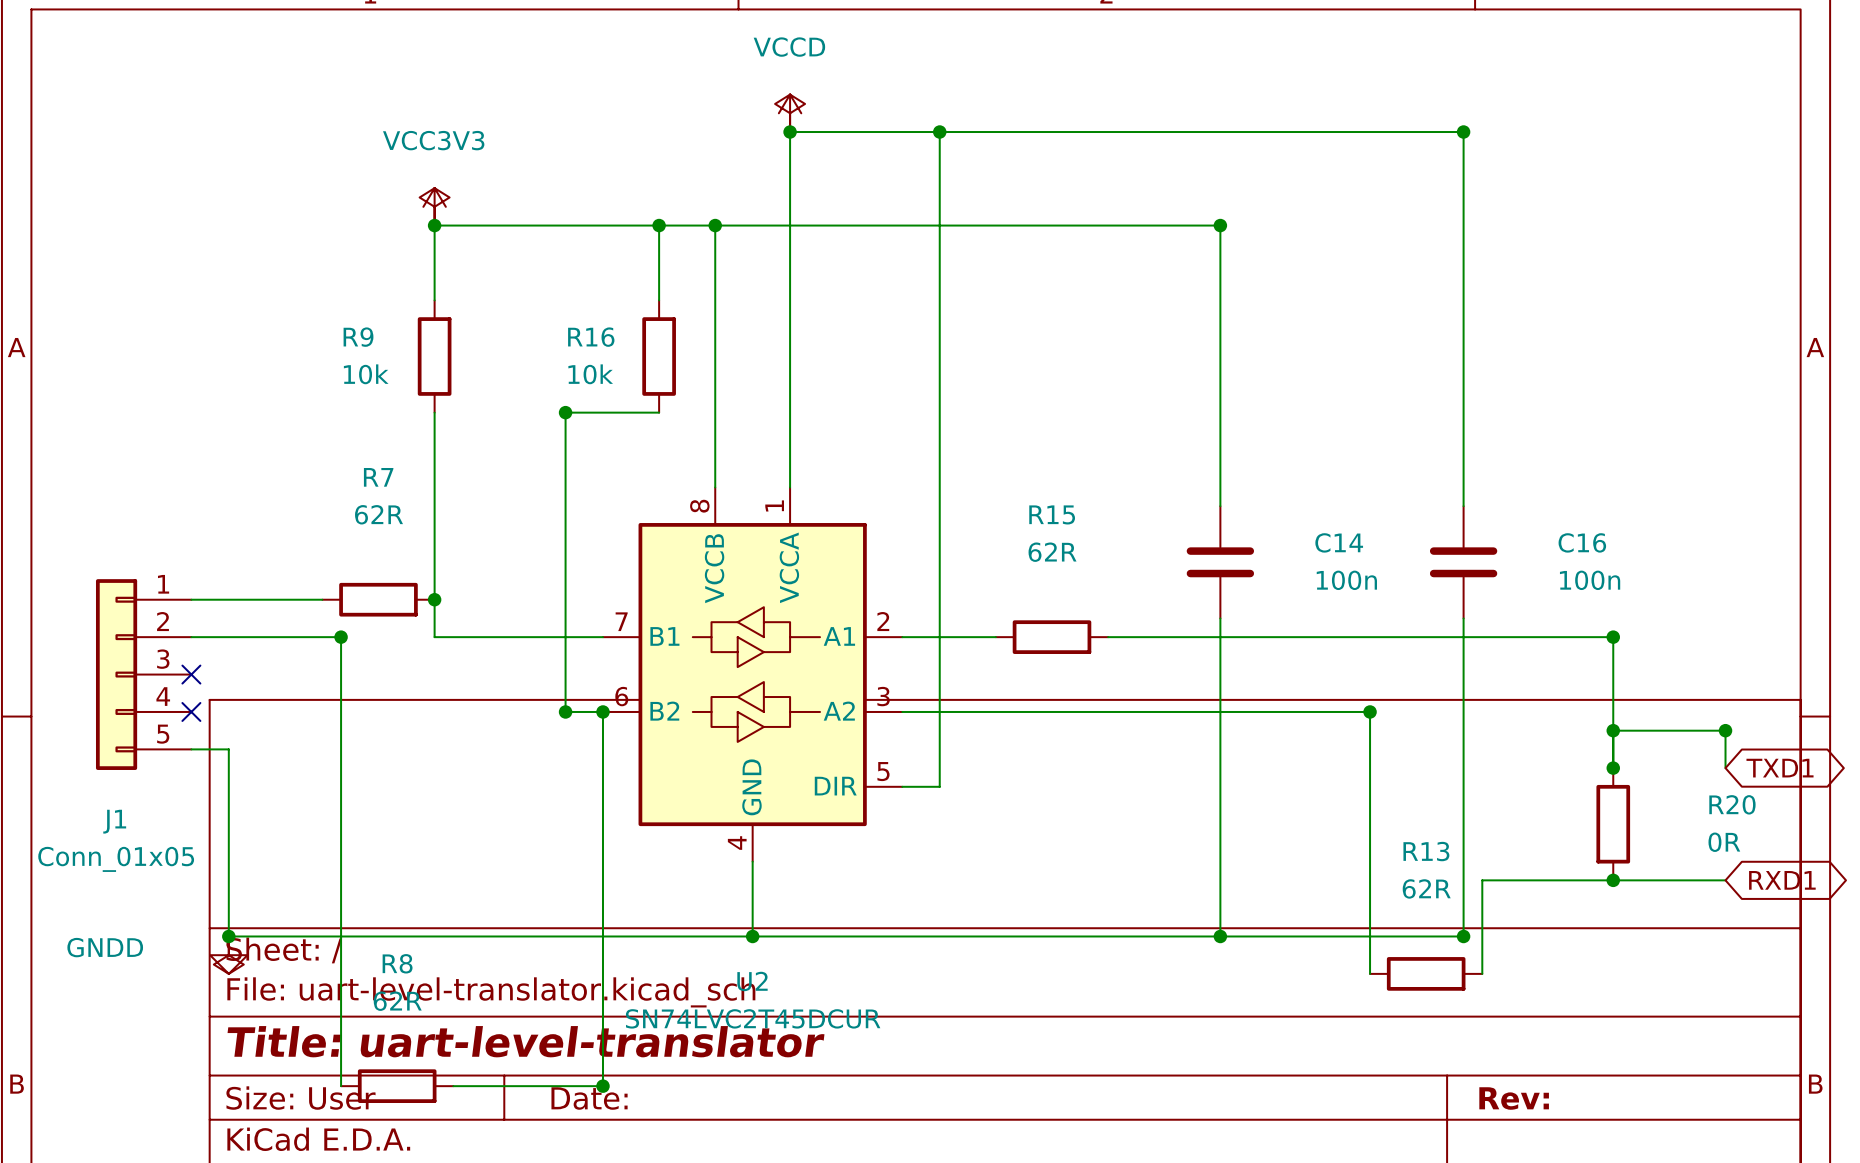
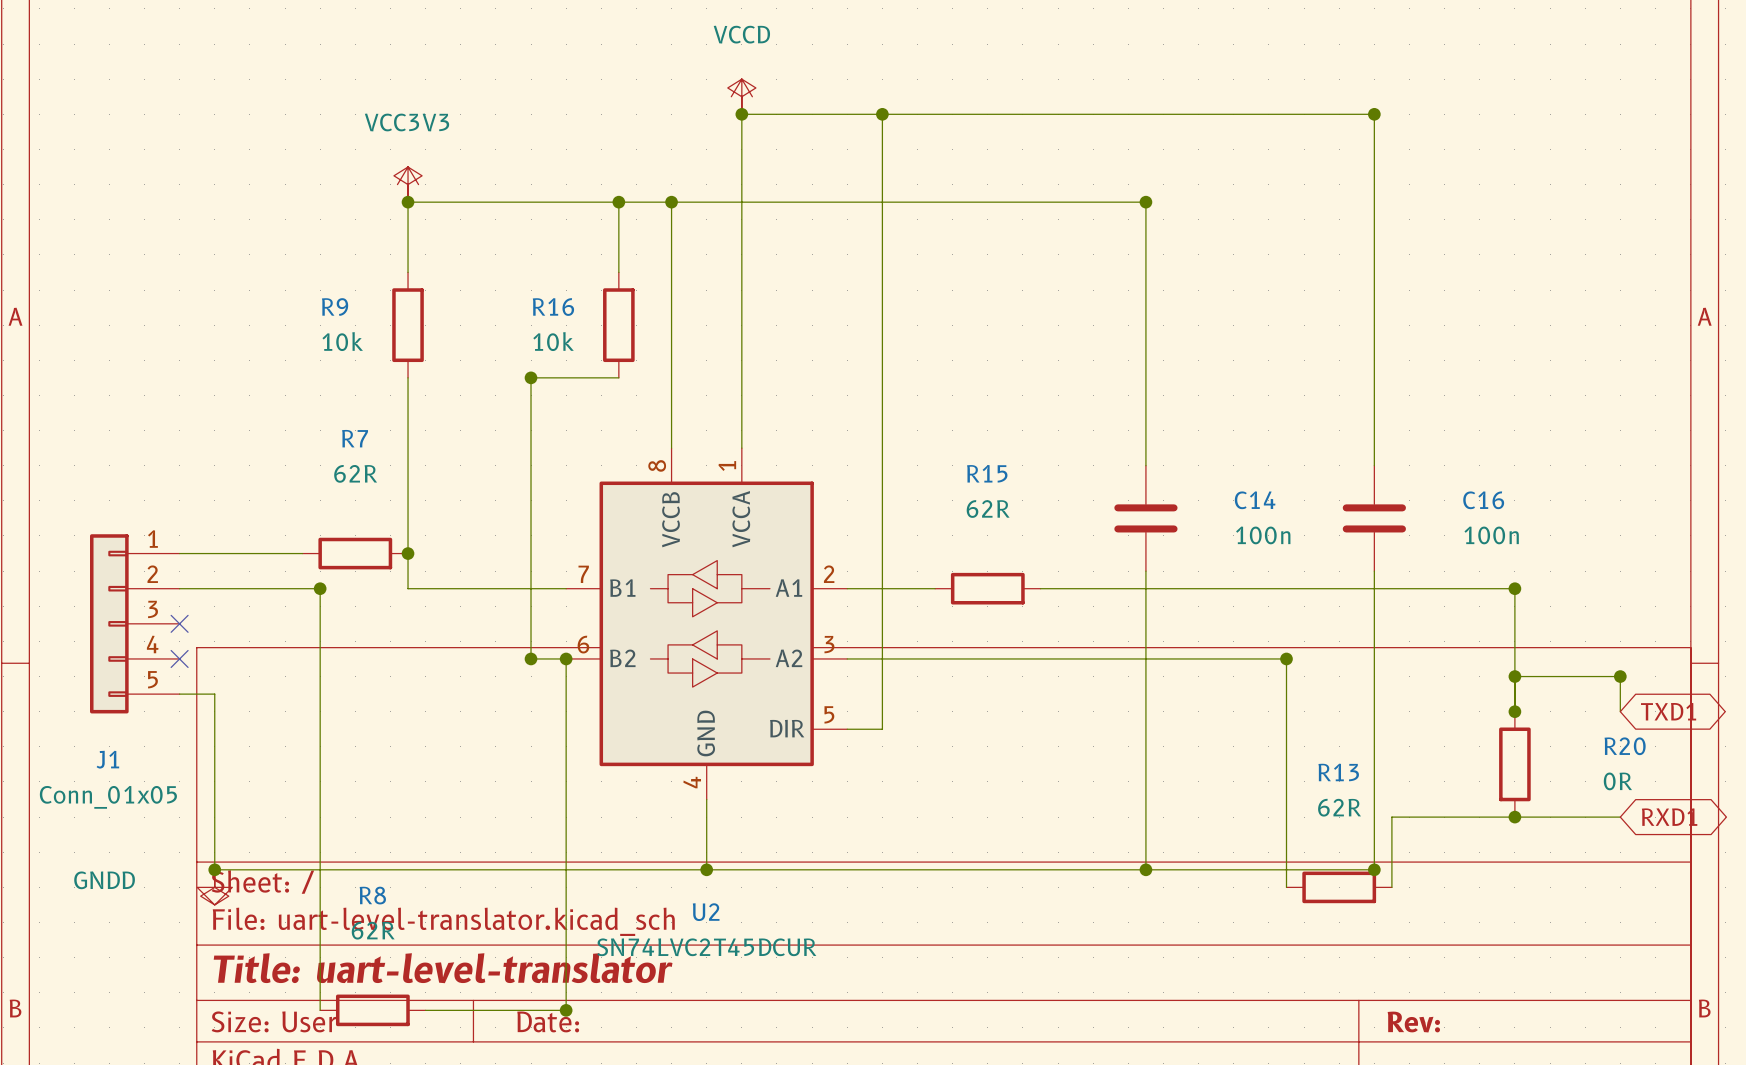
wire: (1370, 955) (1370, 973) -> none
wire: (1482, 955) (1482, 973) -> none
R13 position: (1426, 973) -> (1339, 887)

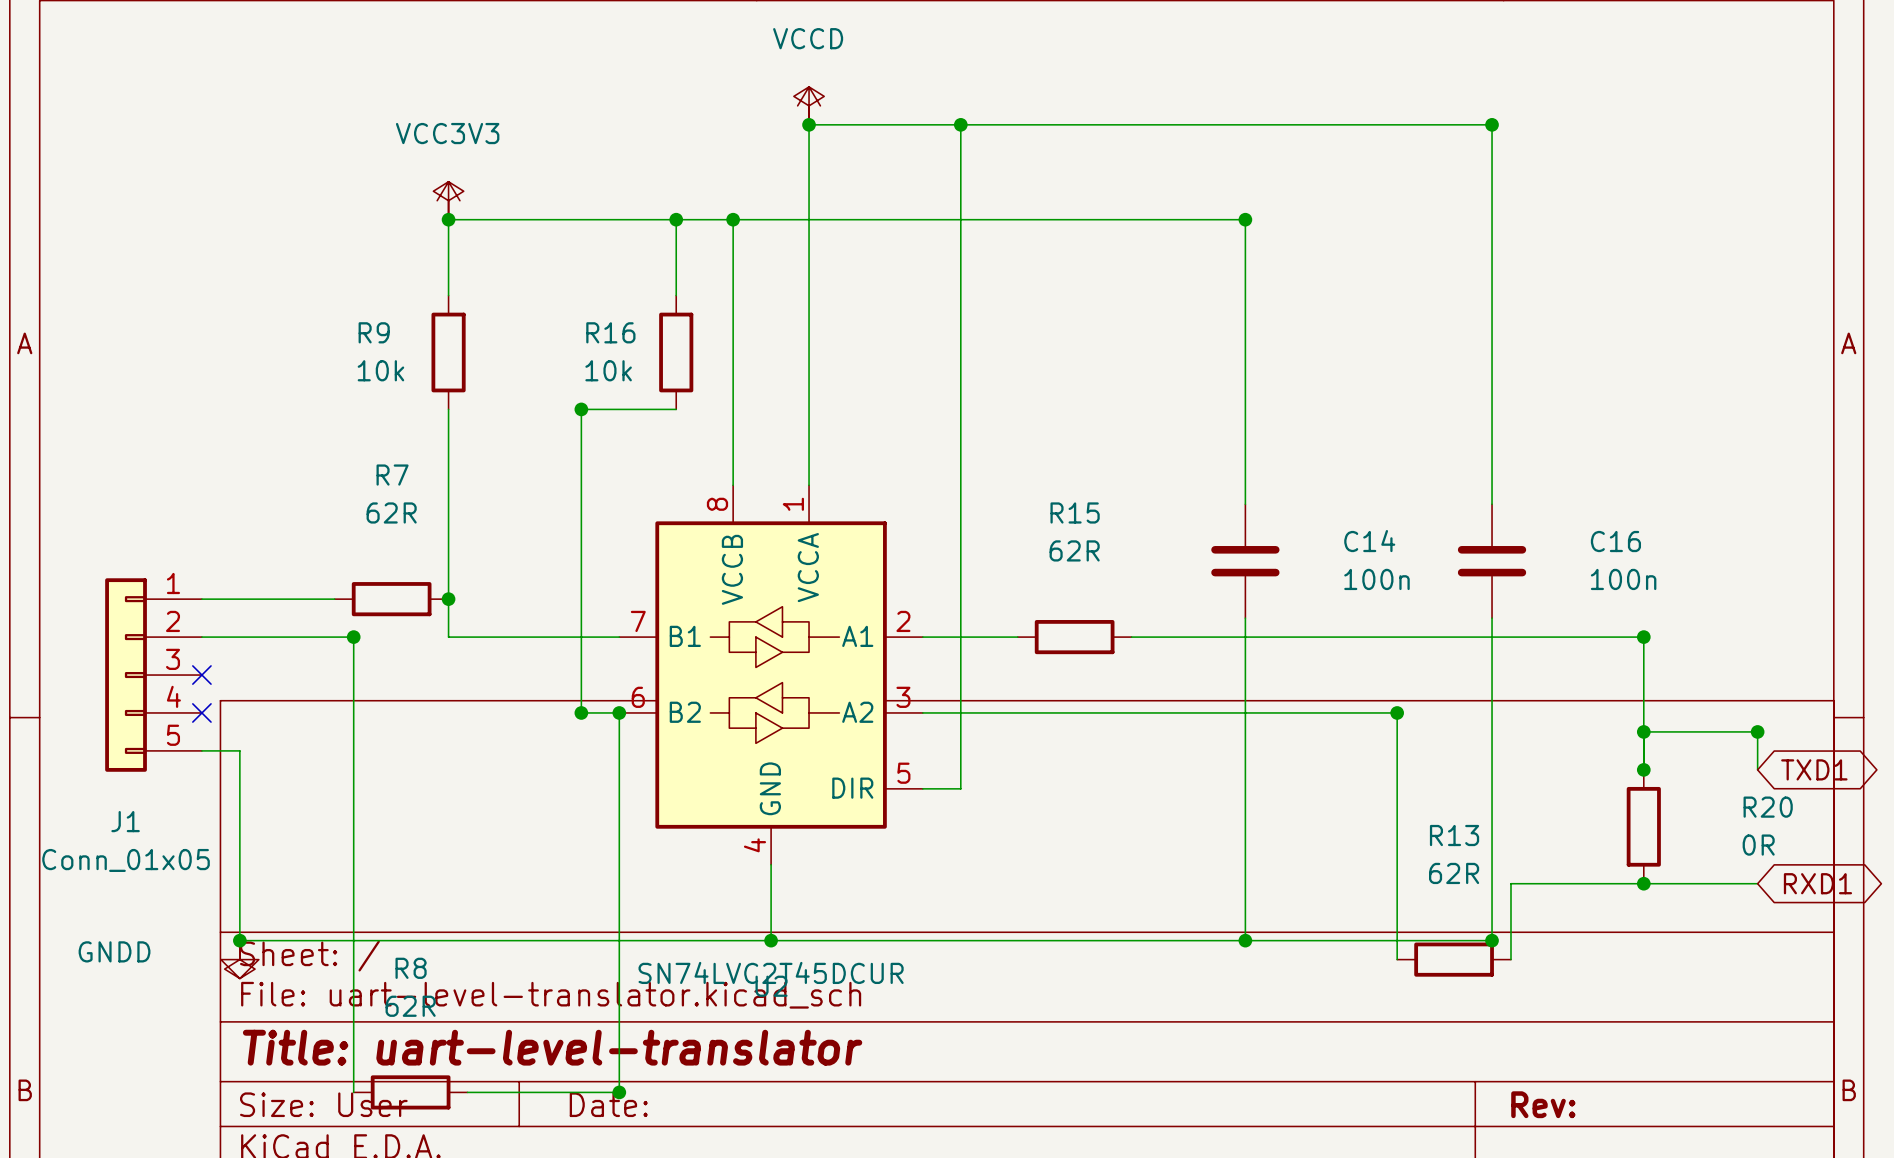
U2 value position: SN74LVC2T45DCUR (706, 947) -> SN74LVC2T45DCUR (771, 972)

